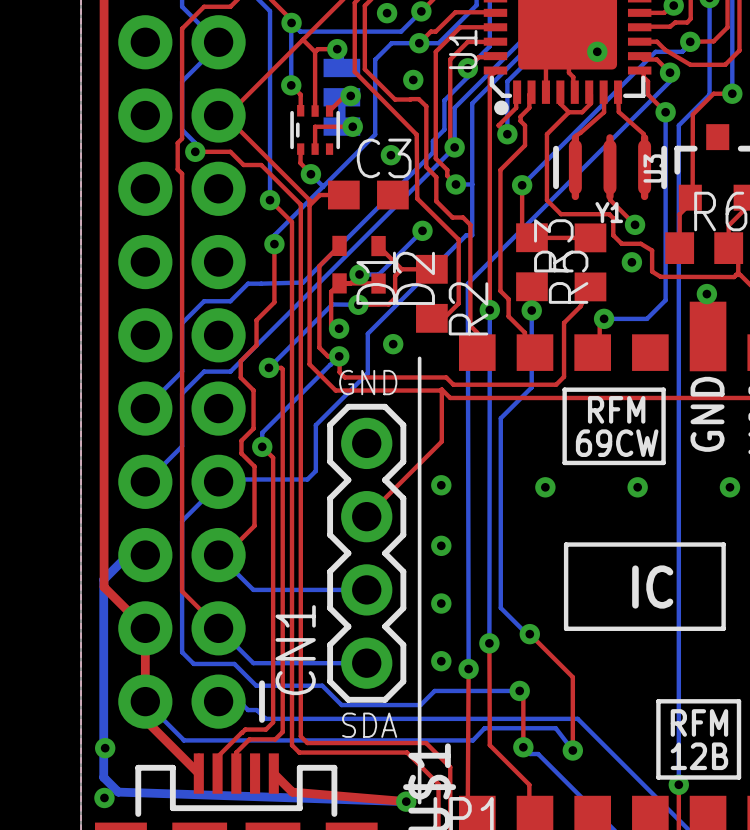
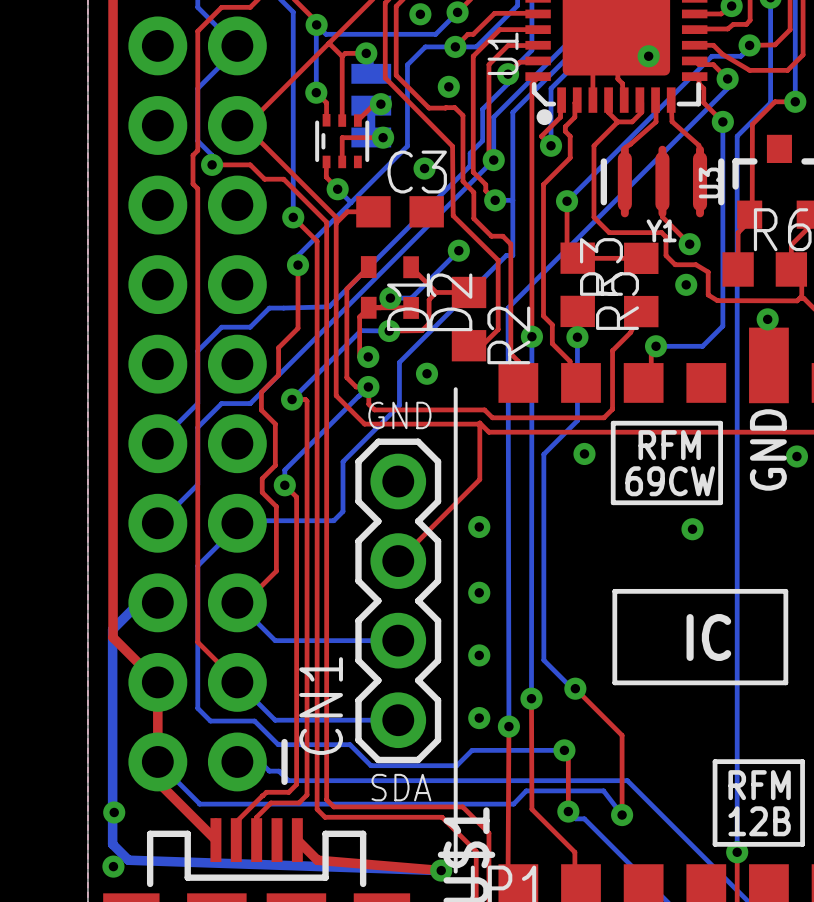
via position: (545, 487) -> (584, 453)
via position: (729, 487) -> (796, 456)

